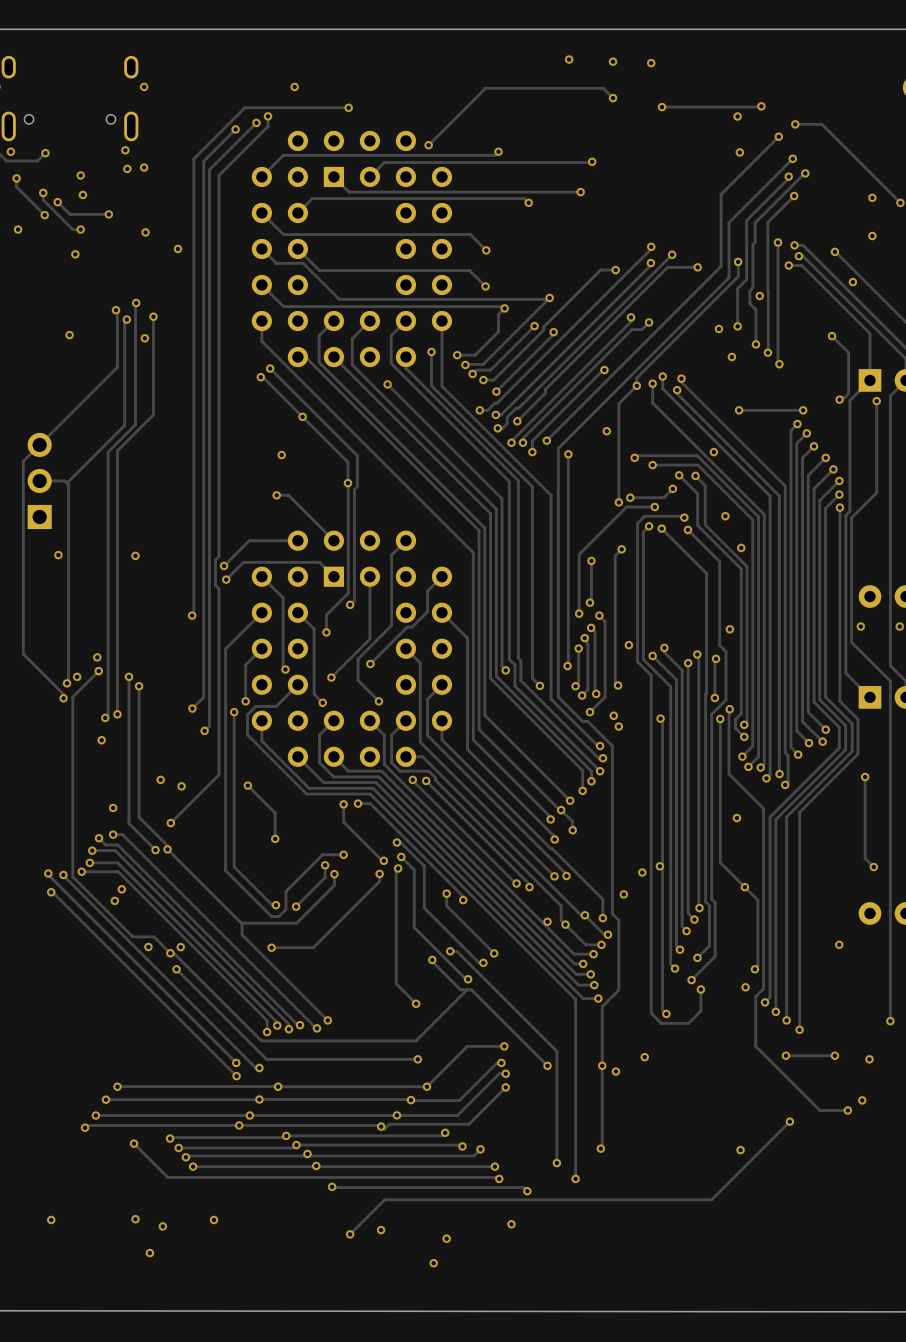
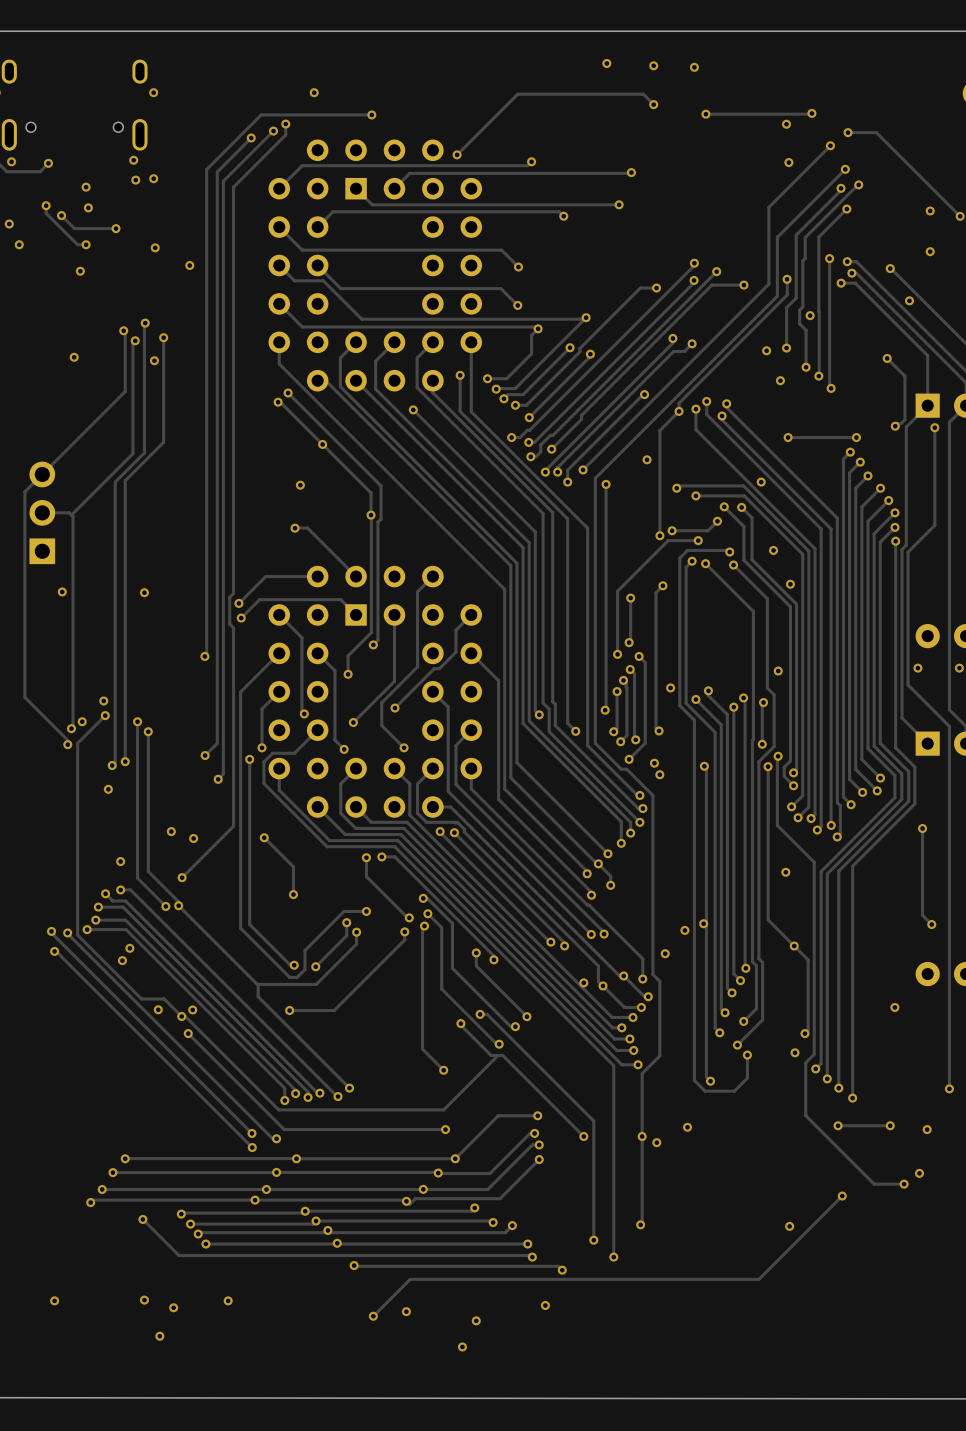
track: (16, 178) (16, 187) (44, 215) -> none
via: (16, 178) -> none
via: none -> (9, 224)
via: (44, 215) -> none

